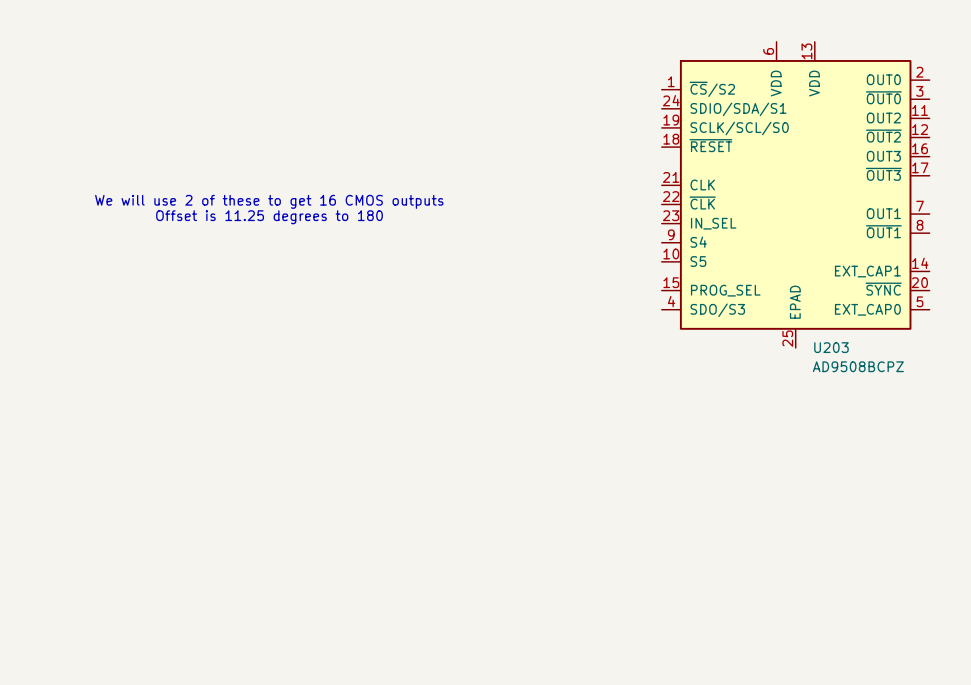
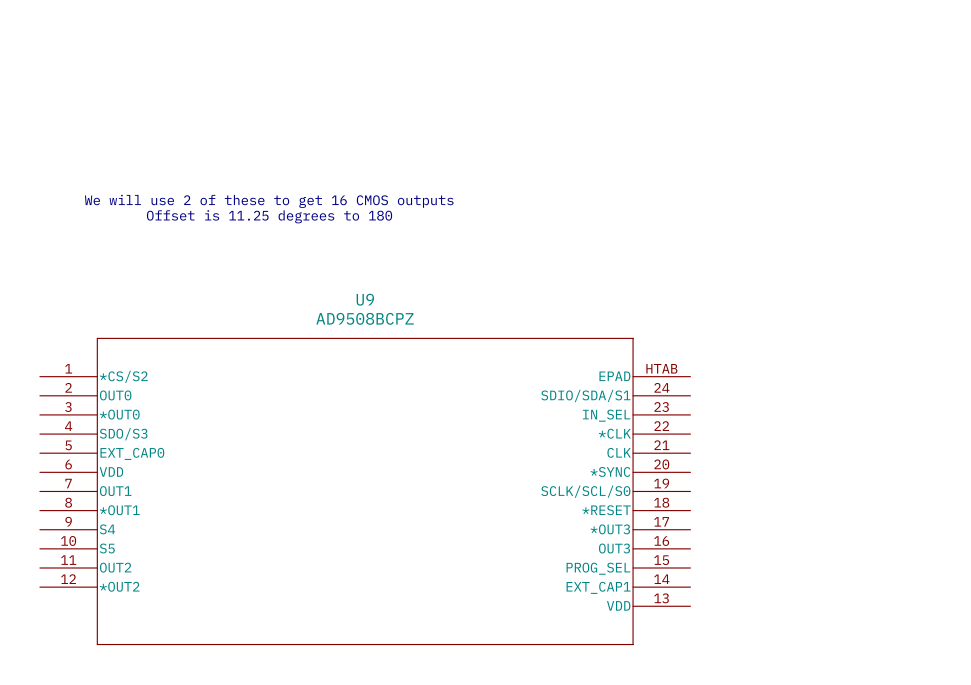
U203: AD9508BCPZ (795, 194) -> none
U9: none -> AD9508BCPZ (365, 491)

